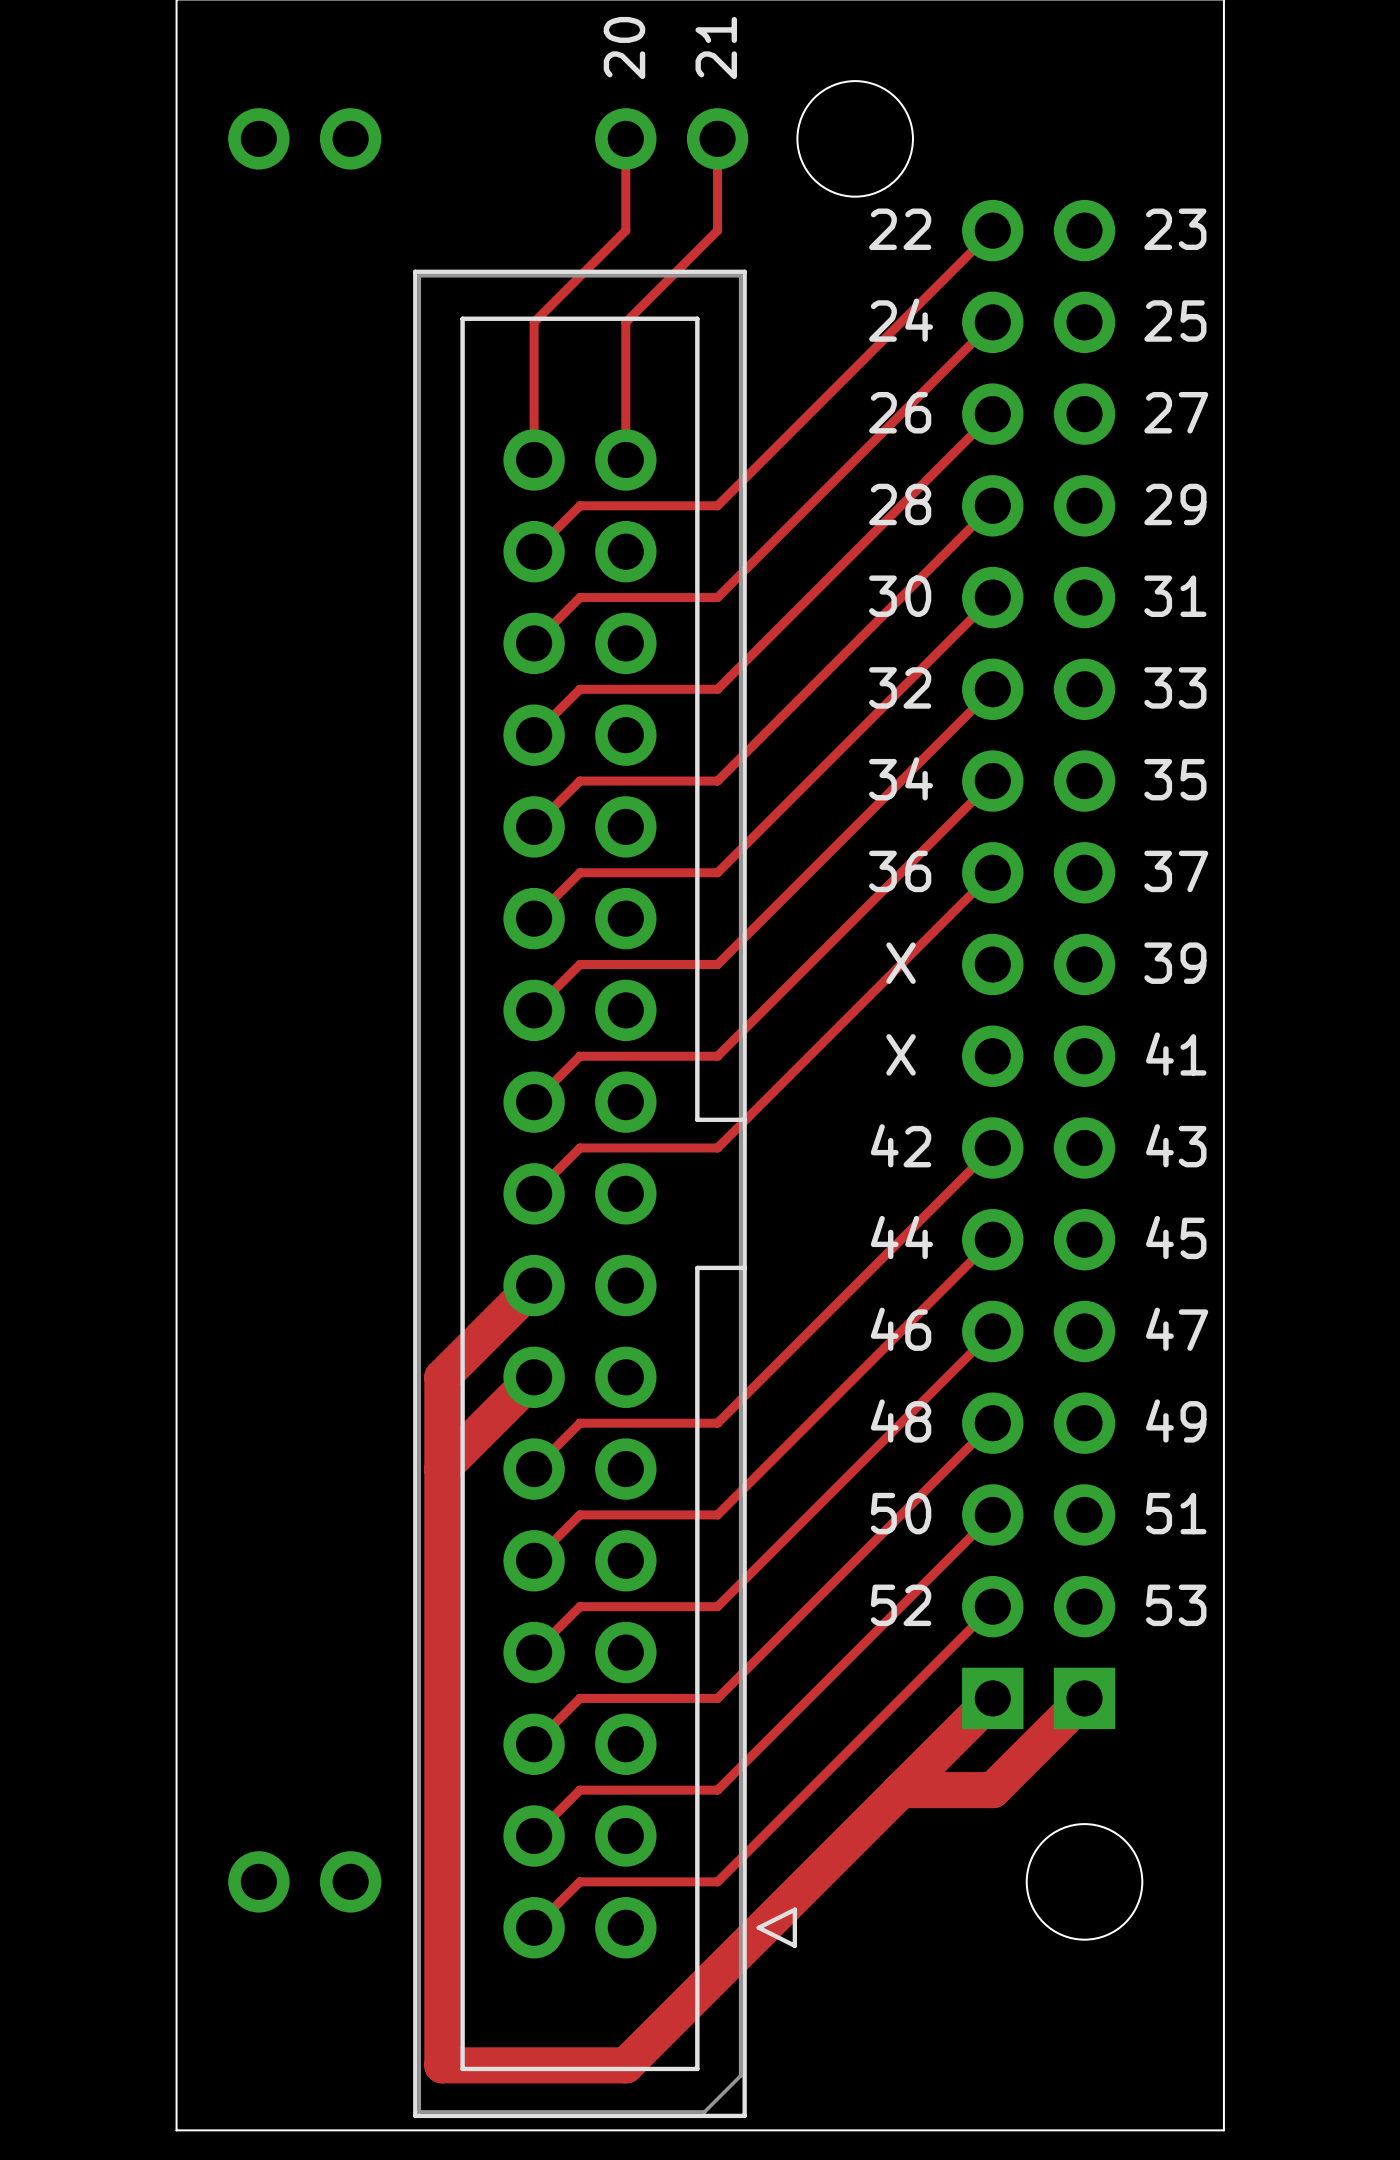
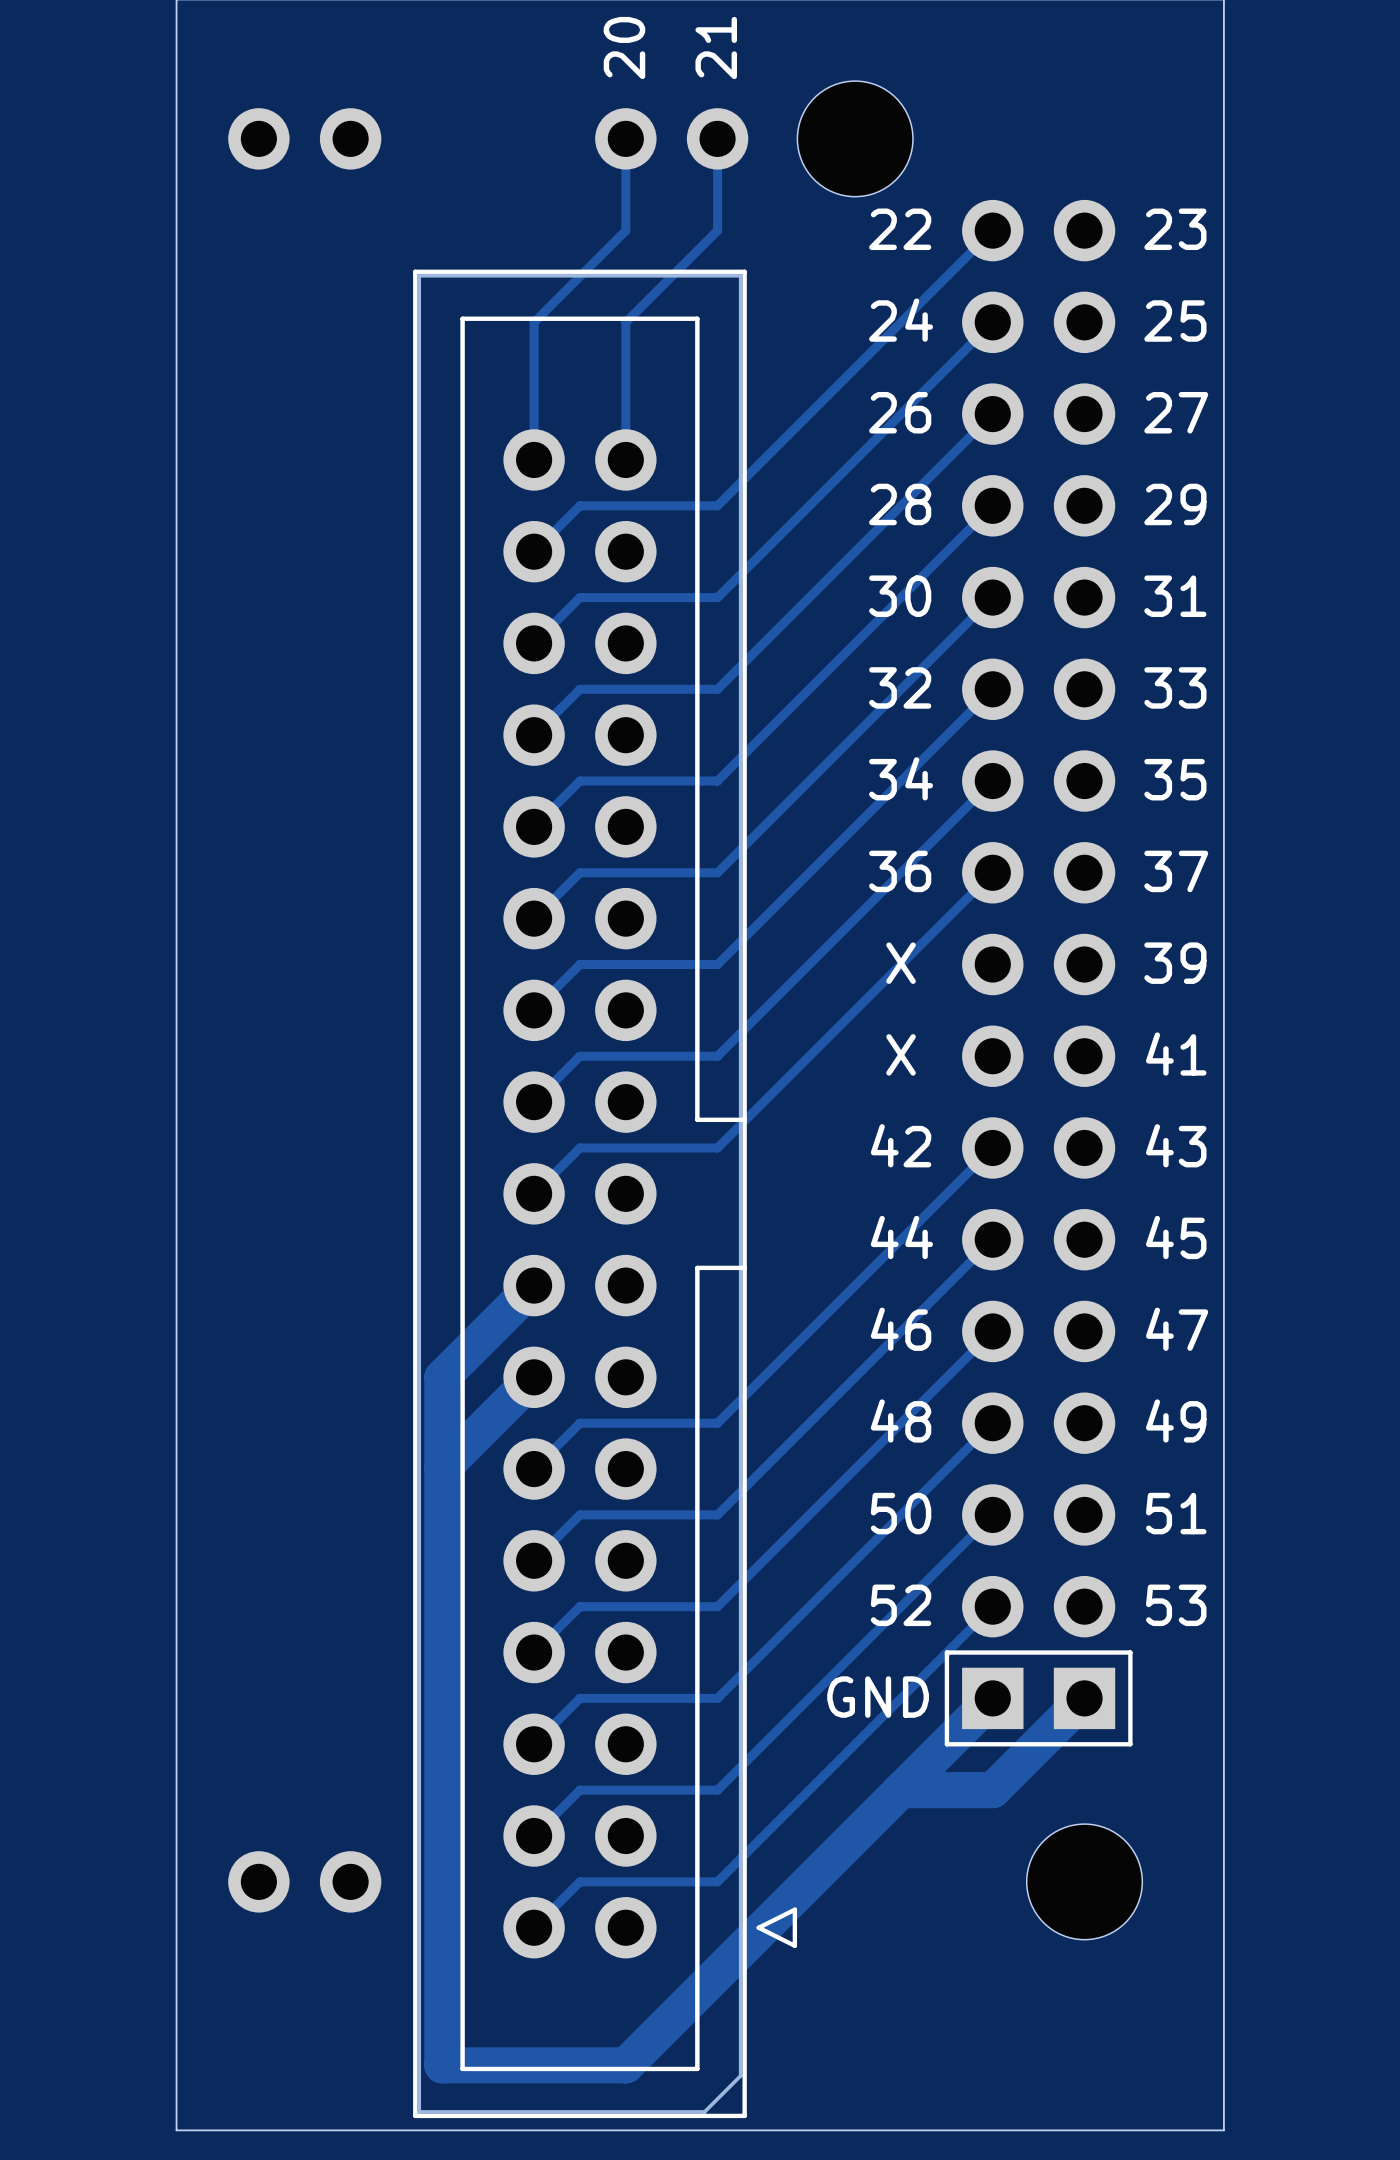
line: none -> (946, 1652) (1130, 1652) (1130, 1744) (946, 1744) (946, 1652)
text: none -> GND (878, 1697)

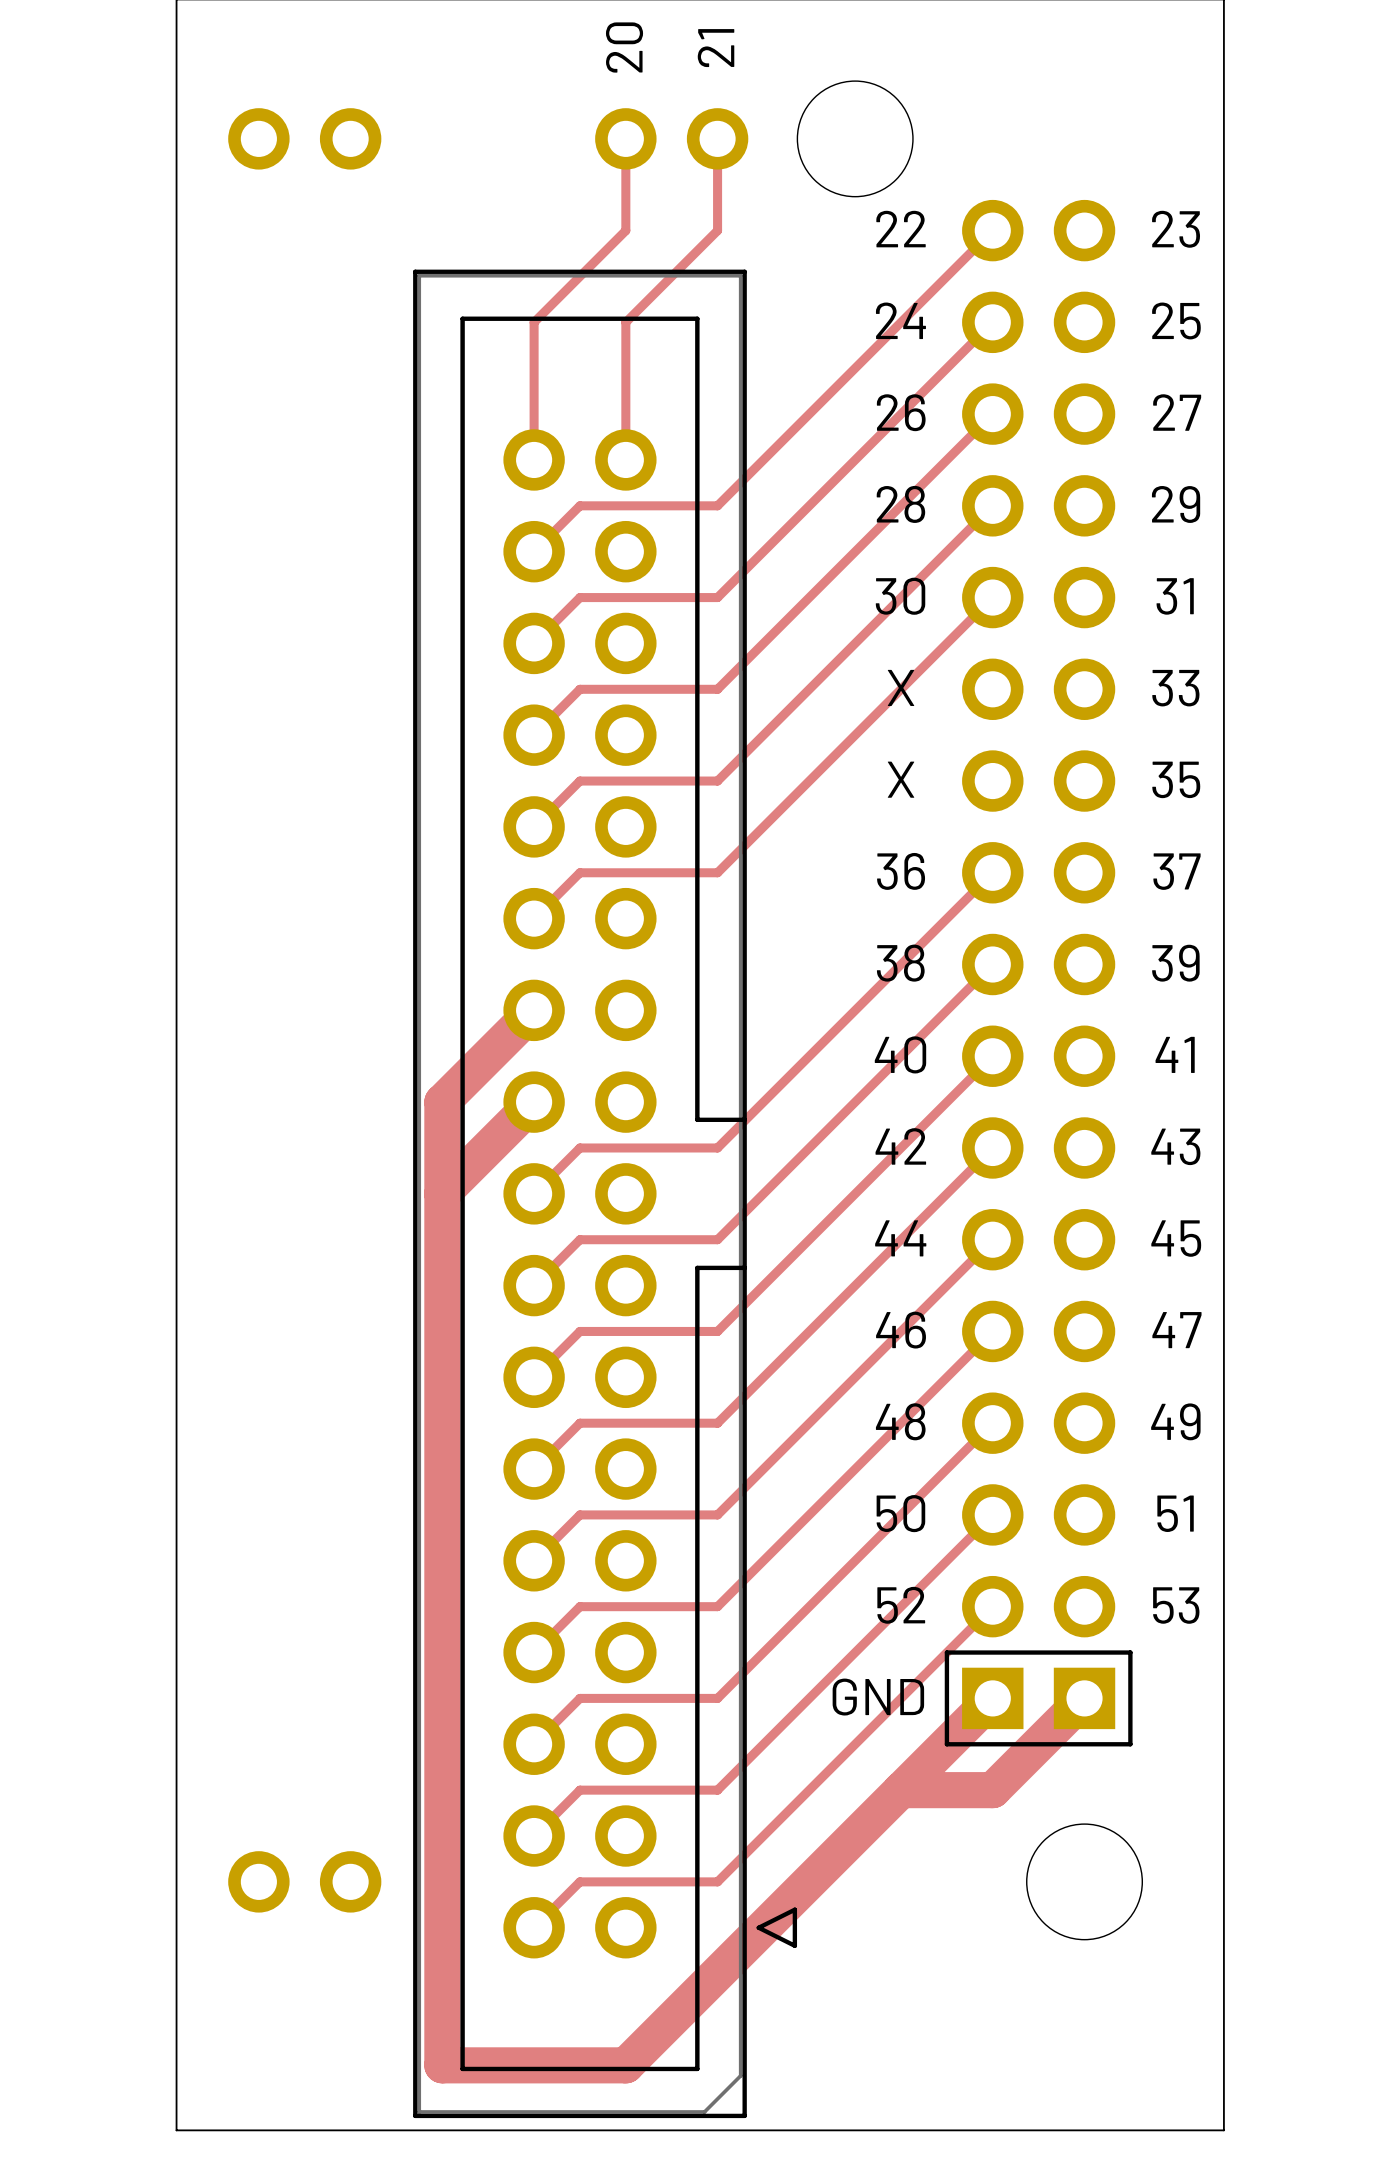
text: 32 (900, 687) -> X (901, 687)
track: (992, 689) (717, 964) (579, 964) (534, 1010) -> (992, 964) (717, 1239) (579, 1239) (534, 1285)
text: 34 (901, 778) -> X (901, 779)
track: (992, 781) (717, 1056) (579, 1056) (534, 1102) -> (442, 1193) (534, 1102)
text: X (901, 963) -> 38 (900, 963)
text: X (901, 1054) -> 40 (900, 1054)
track: (534, 1285) (442, 1377) -> (534, 1010) (442, 1102) (442, 1377)
track: (534, 1377) (442, 1469) -> (534, 1377) (579, 1331) (717, 1331) (992, 1056)

